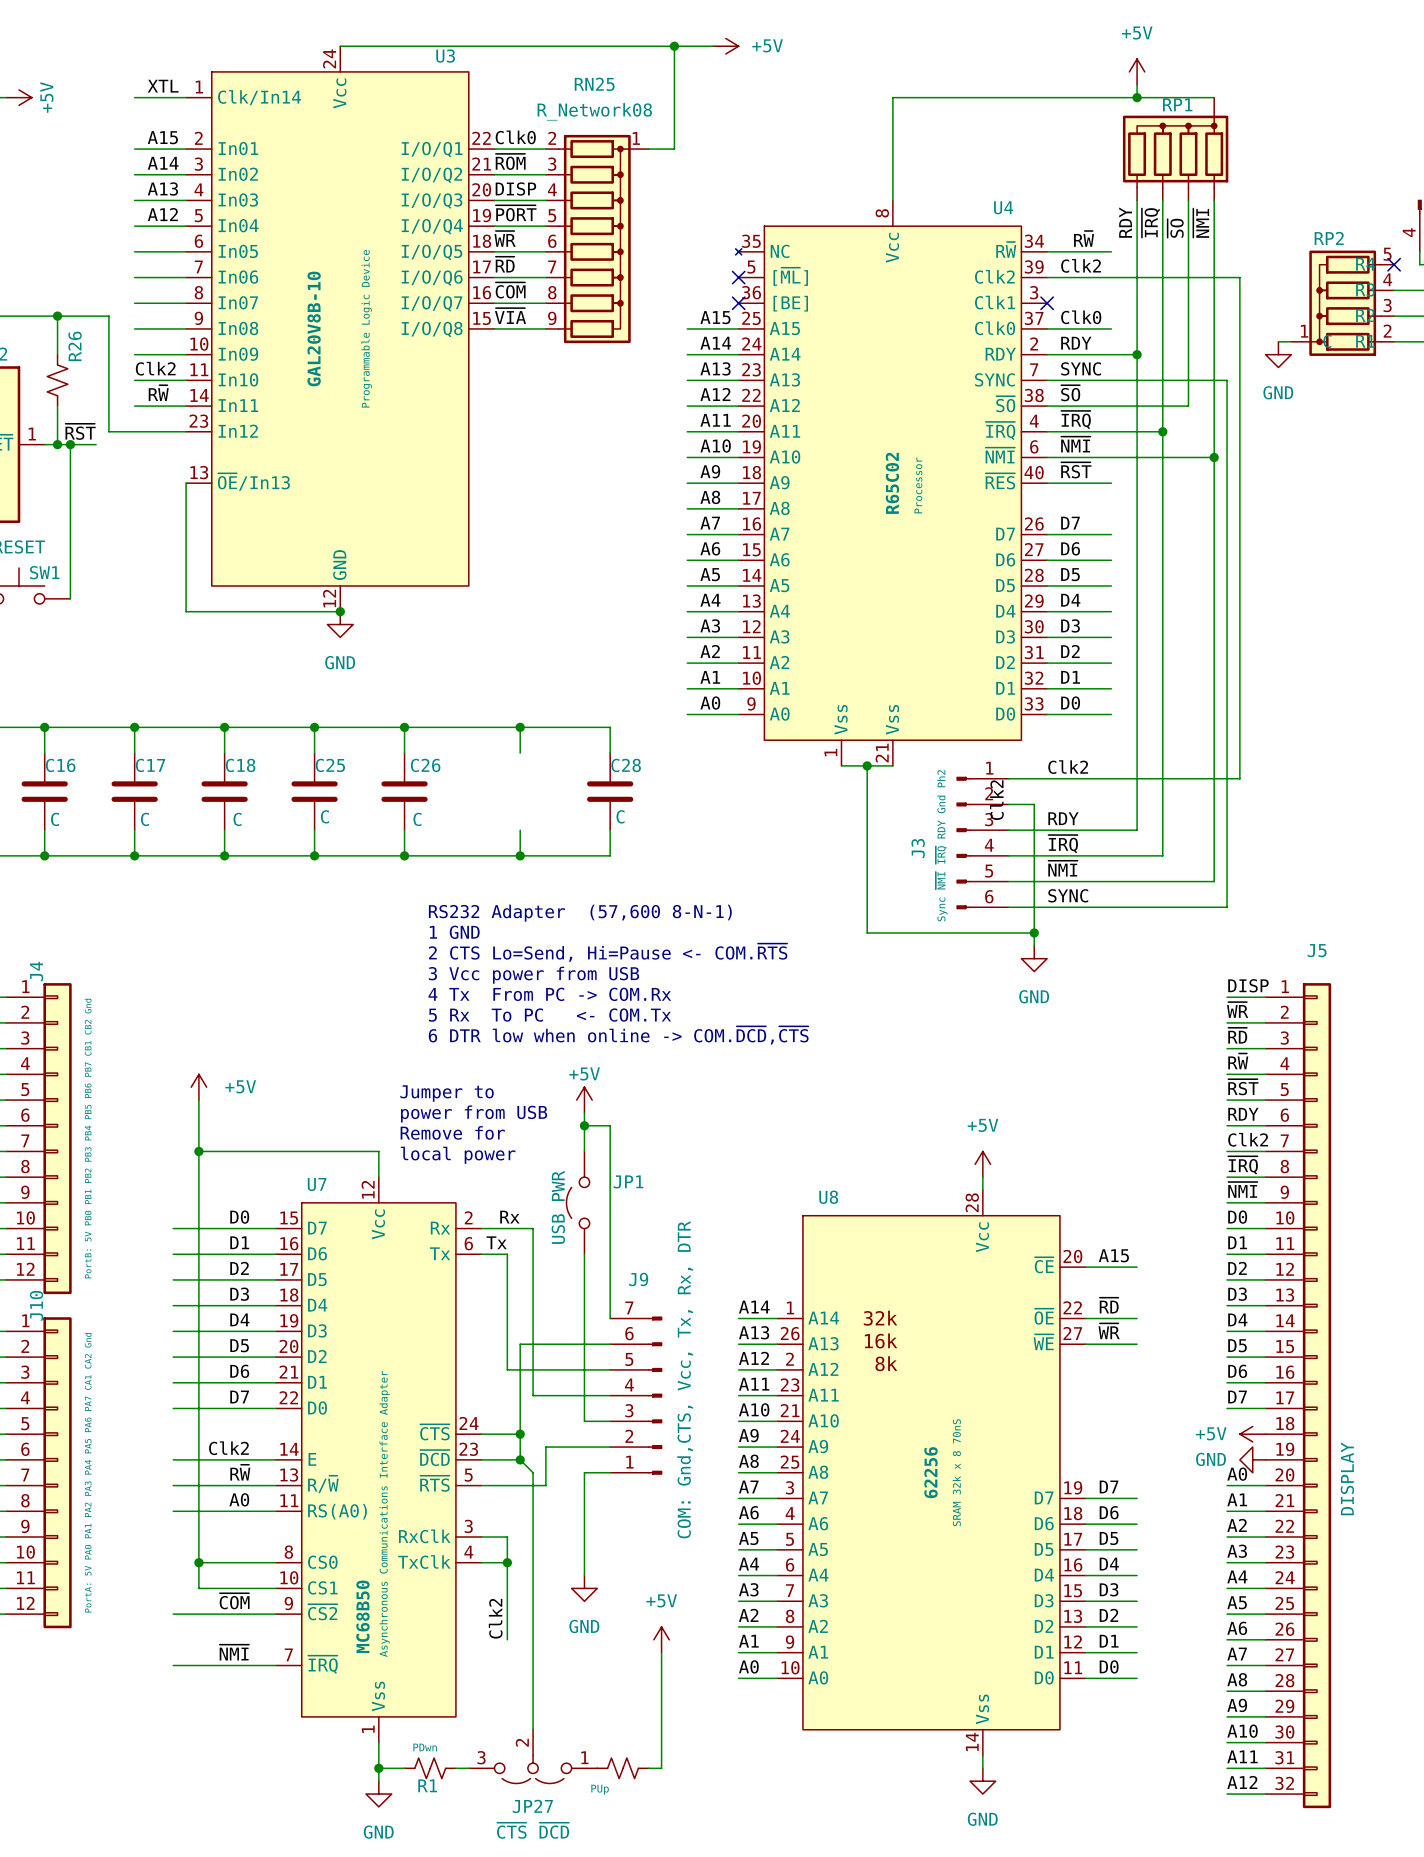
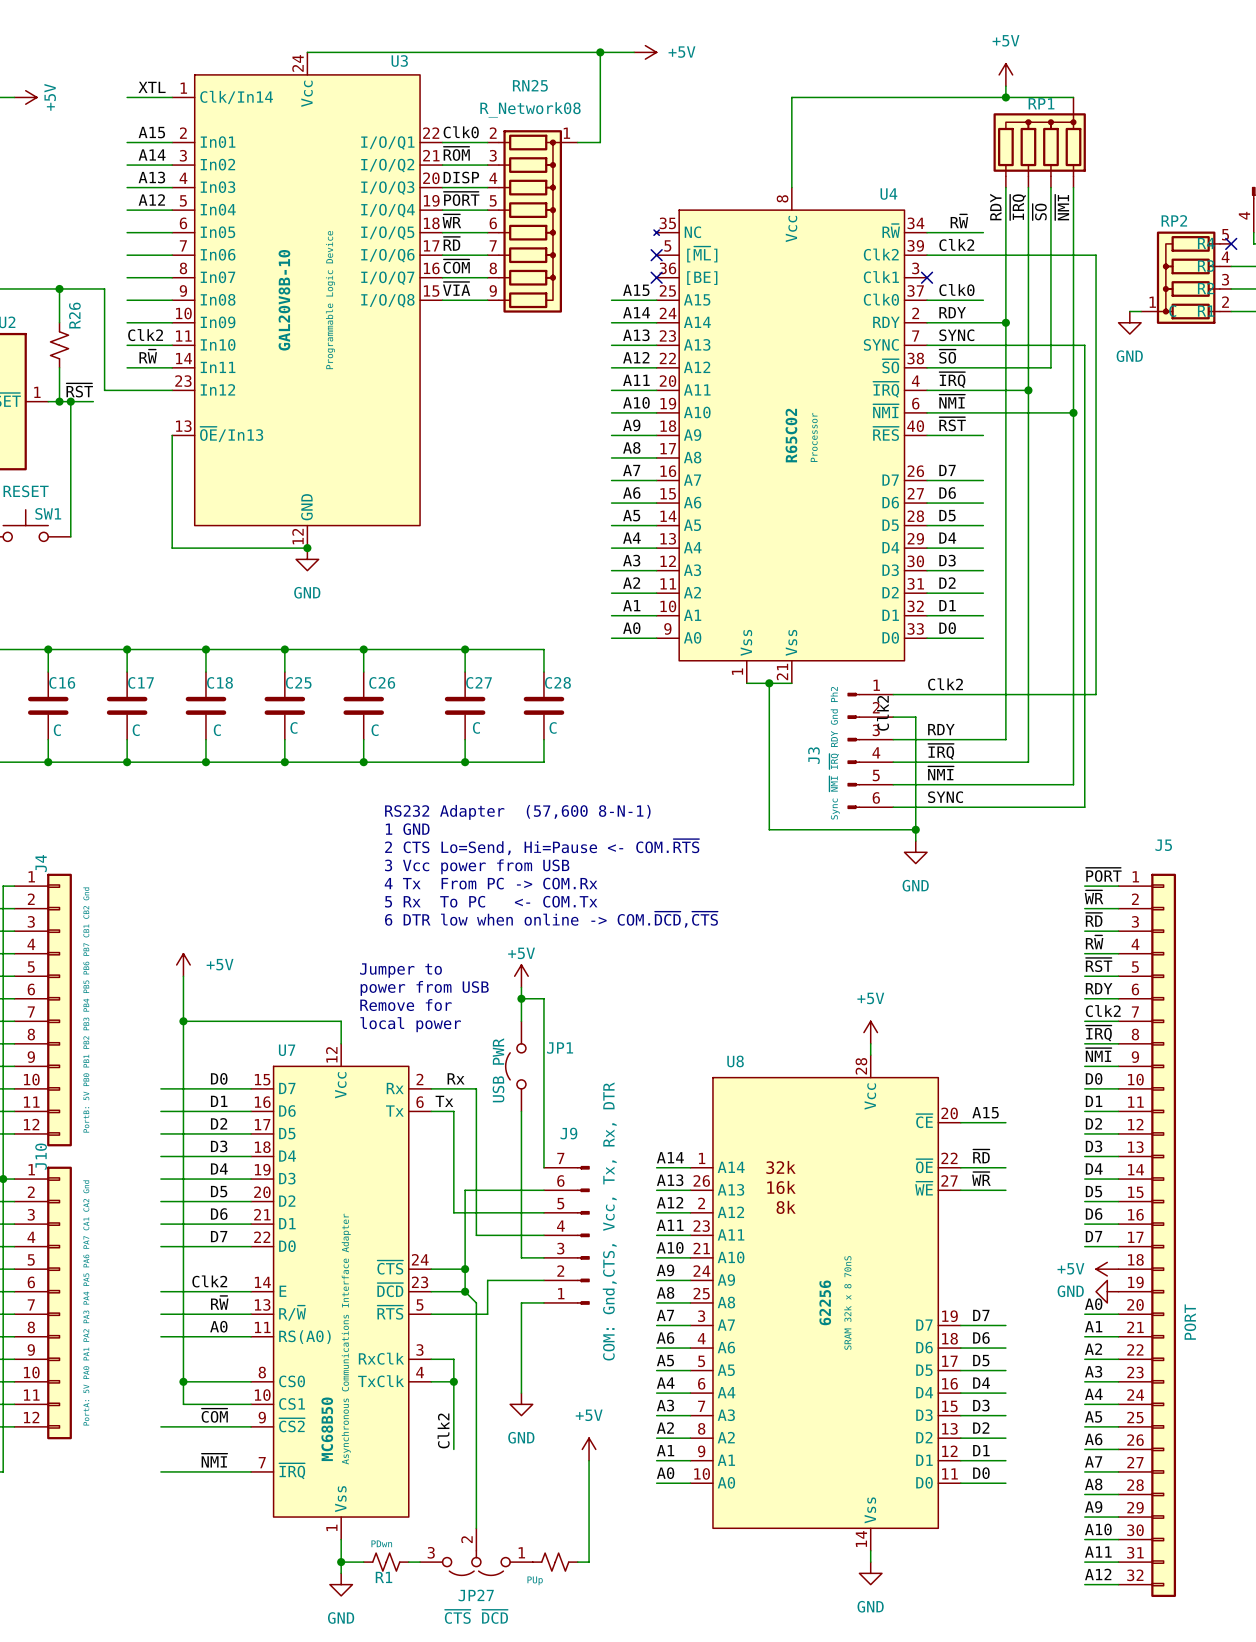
C27: none -> C (465, 705)
label: DISP (1248, 985) -> ~{PORT} (1103, 874)
J5 value: DISPLAY (1347, 1478) -> PORT (1190, 1322)

